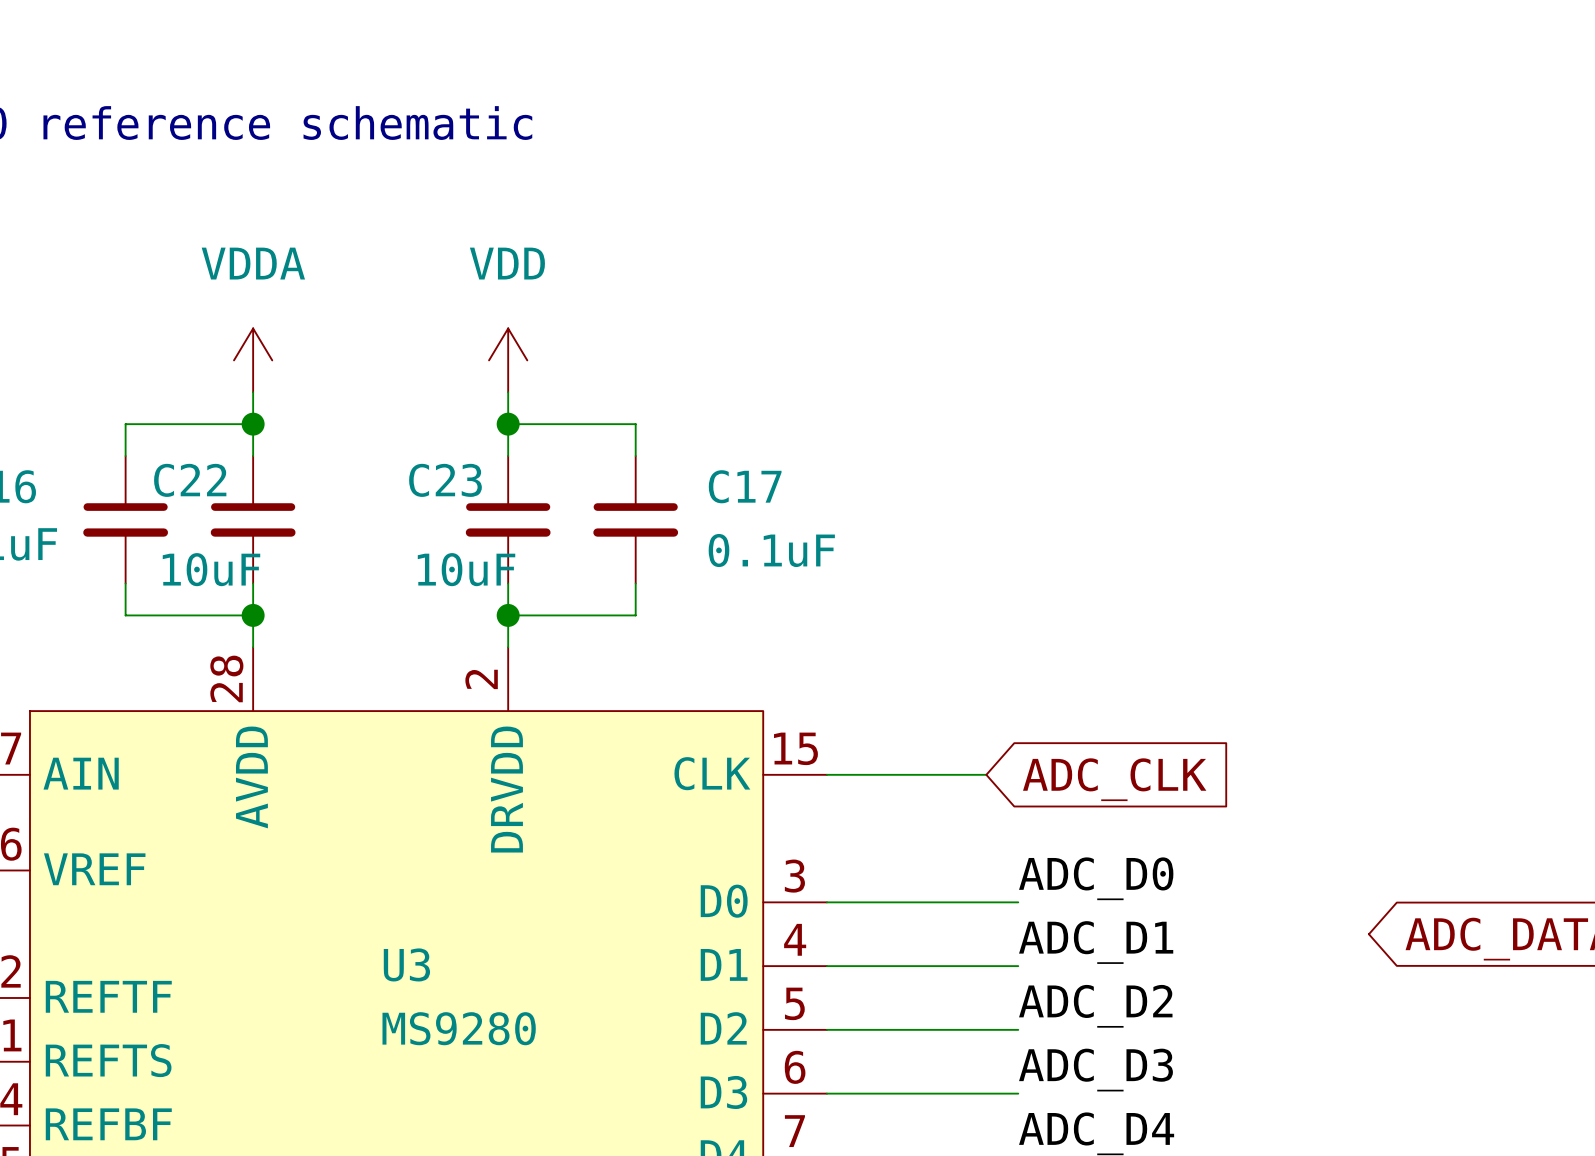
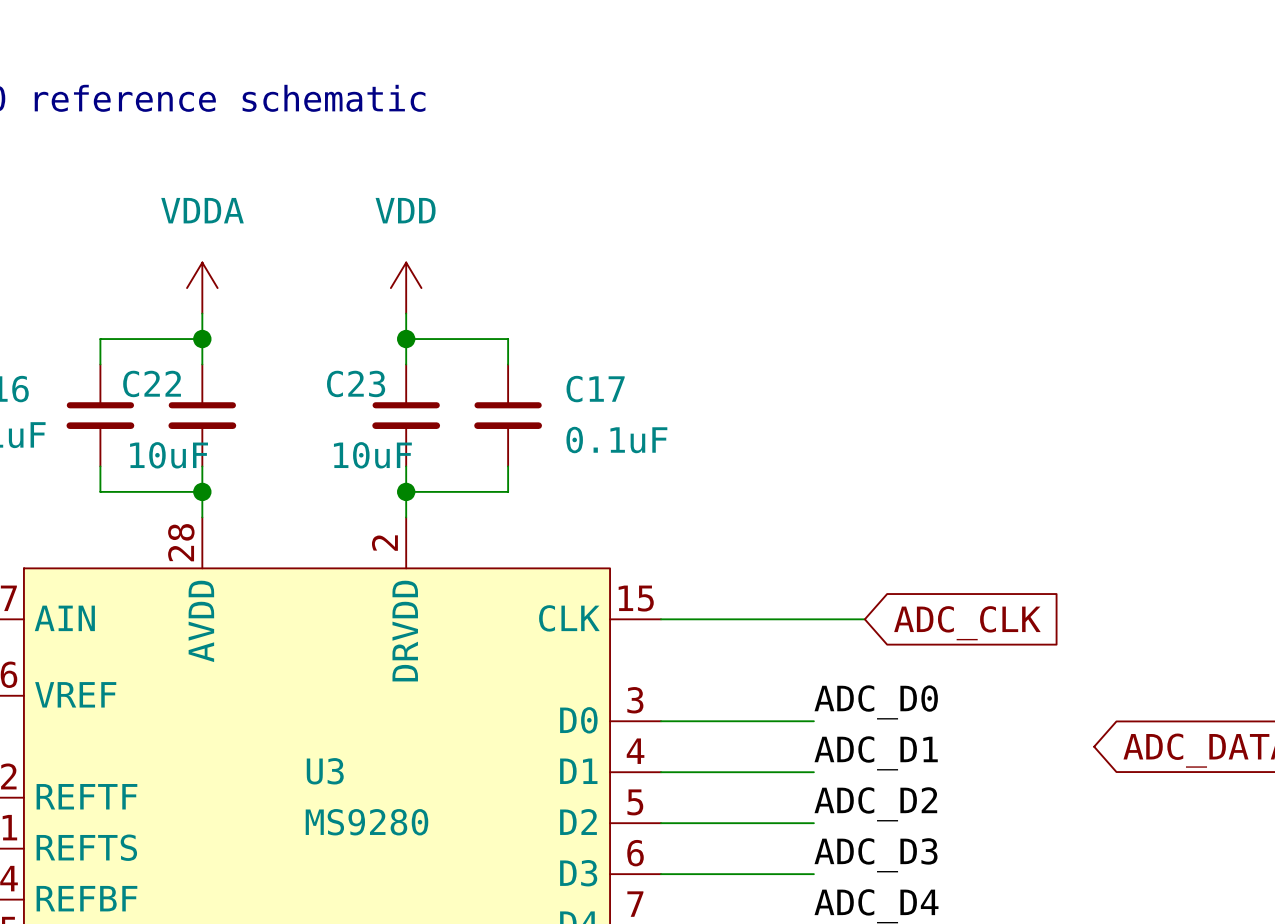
wire: none -> (788, 619) (864, 619)
global label position: ADC_CLK (1114, 779) -> ADC_CLK (967, 623)

